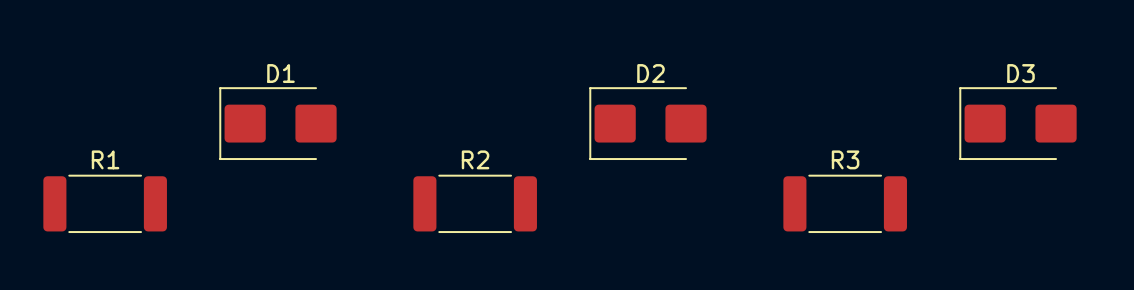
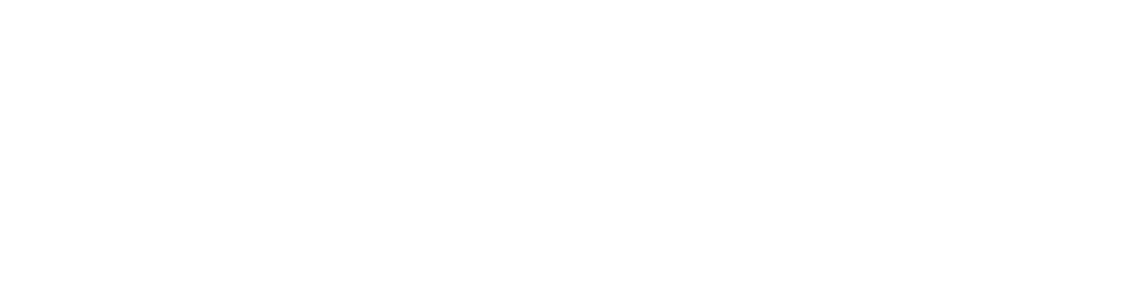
D1: (277, 123) -> none
D2: (647, 123) -> none
D3: (1017, 123) -> none
R1: (105, 203) -> none
R2: (475, 203) -> none
R3: (845, 203) -> none

